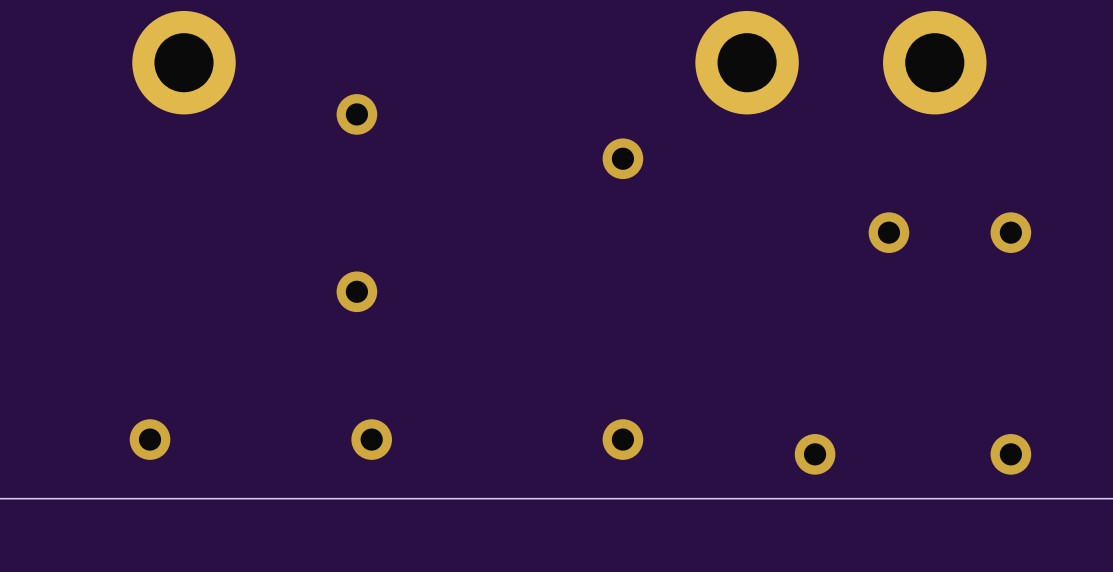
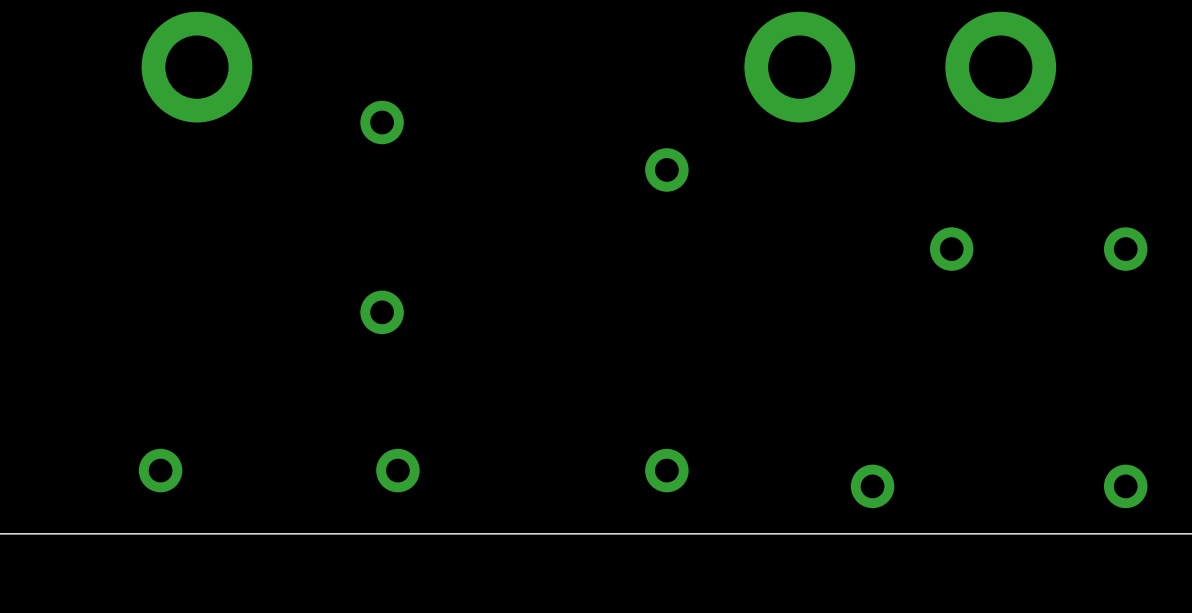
via position: (1010, 232) -> (1125, 249)
via position: (1010, 454) -> (1125, 486)

